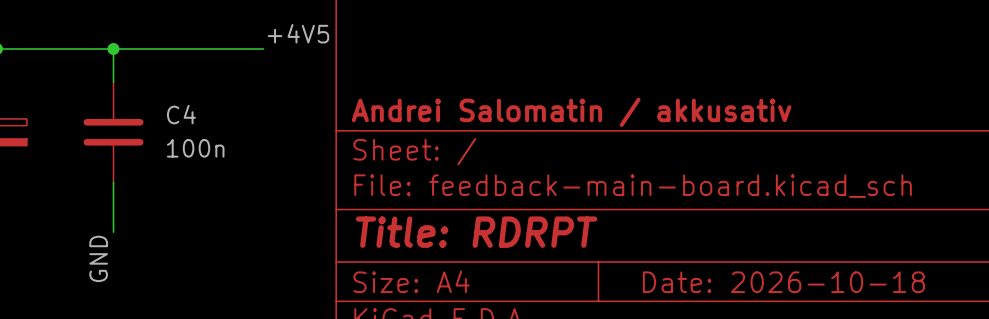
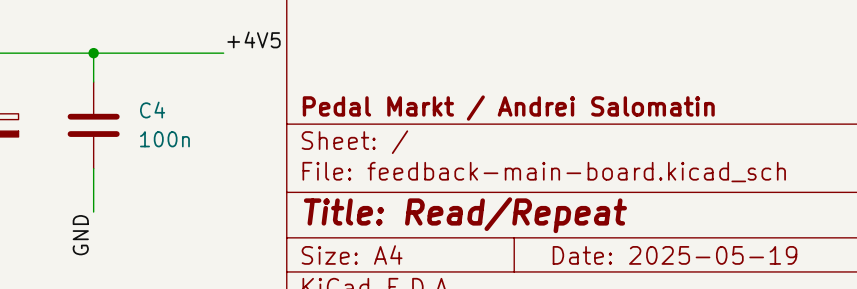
title block: Andrei Salomatin / akkusativ (571, 112) -> Pedal Markt / Andrei Salomatin (508, 108)
title block: Title: RDRPT (476, 232) -> Title: Read/Repeat (465, 215)
title block: Date: 2026-10-18 (783, 282) -> Date: 2025-05-19 (674, 255)

